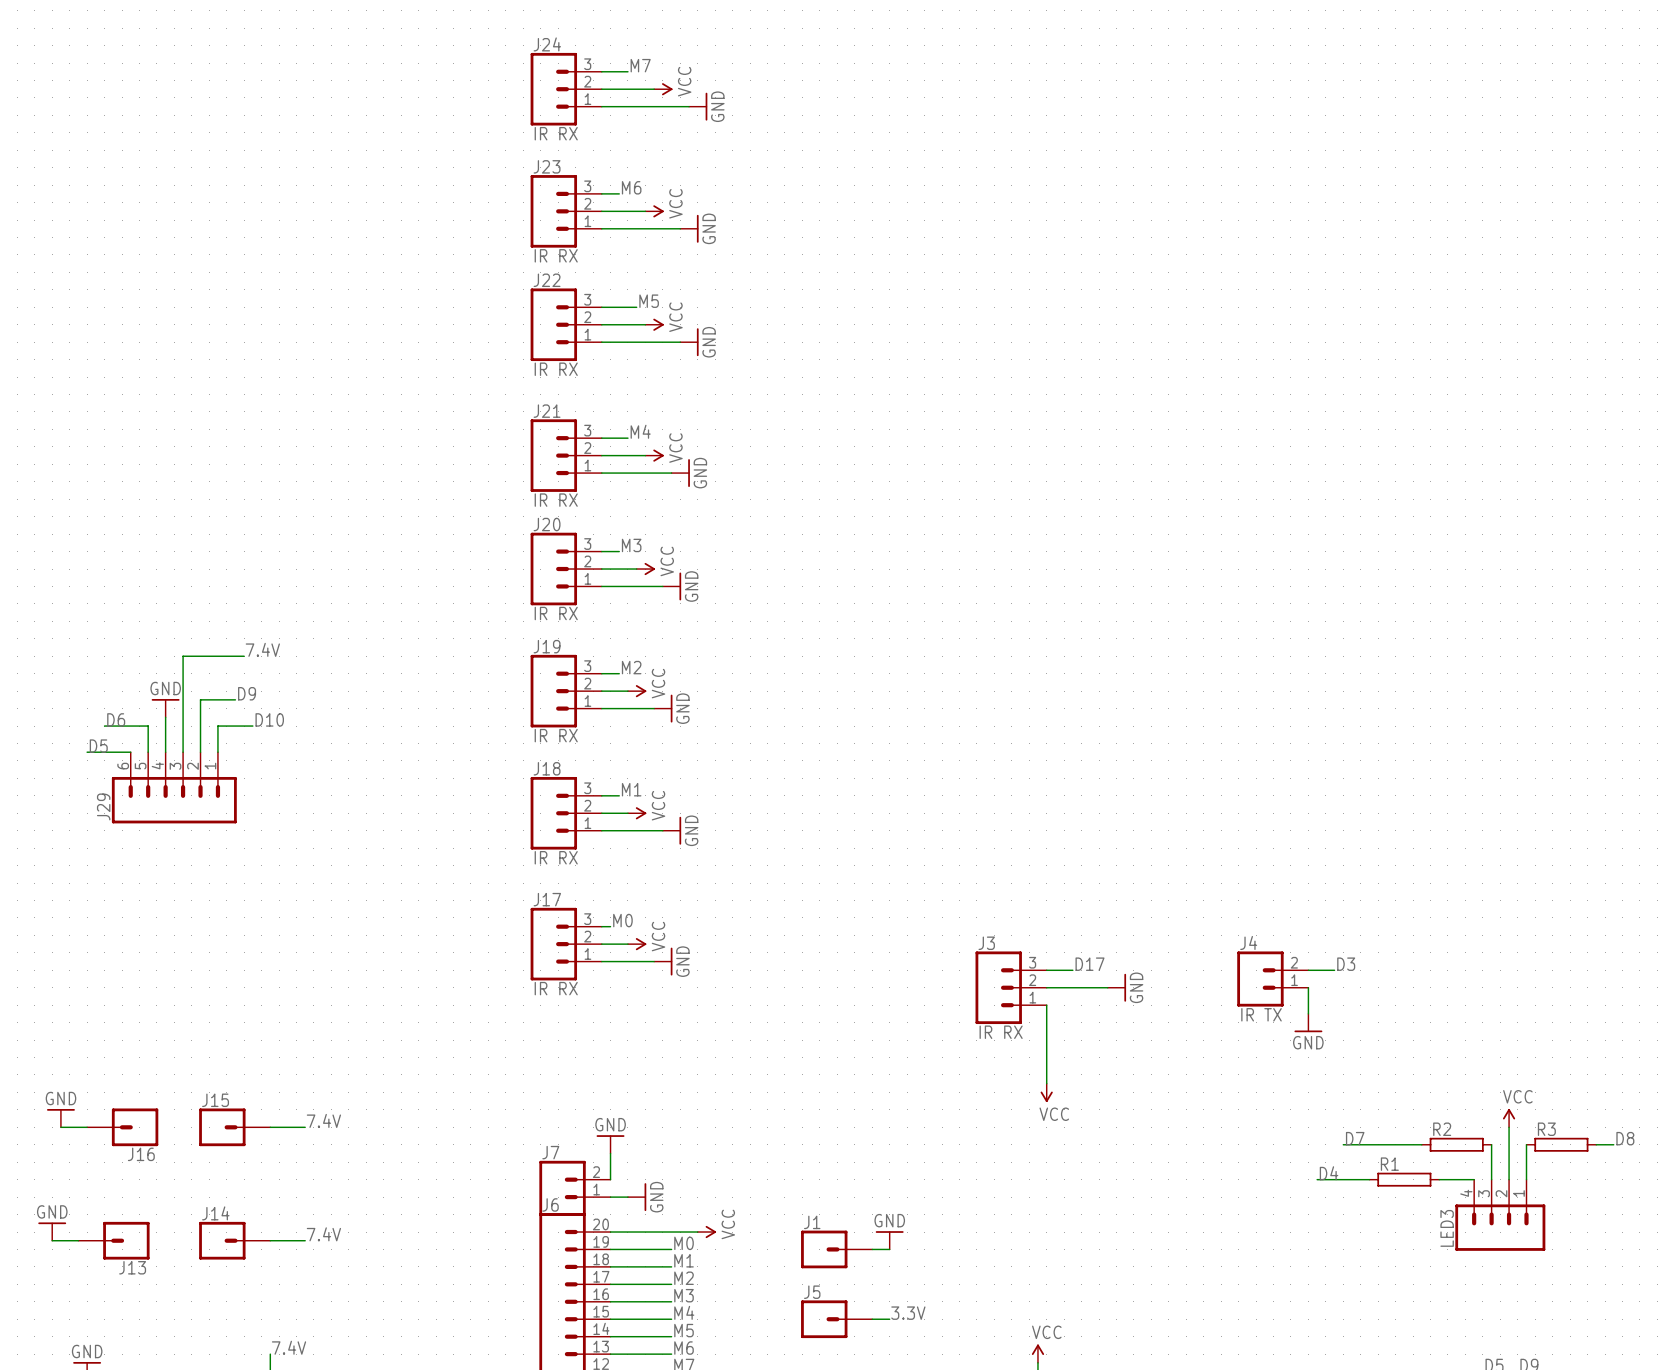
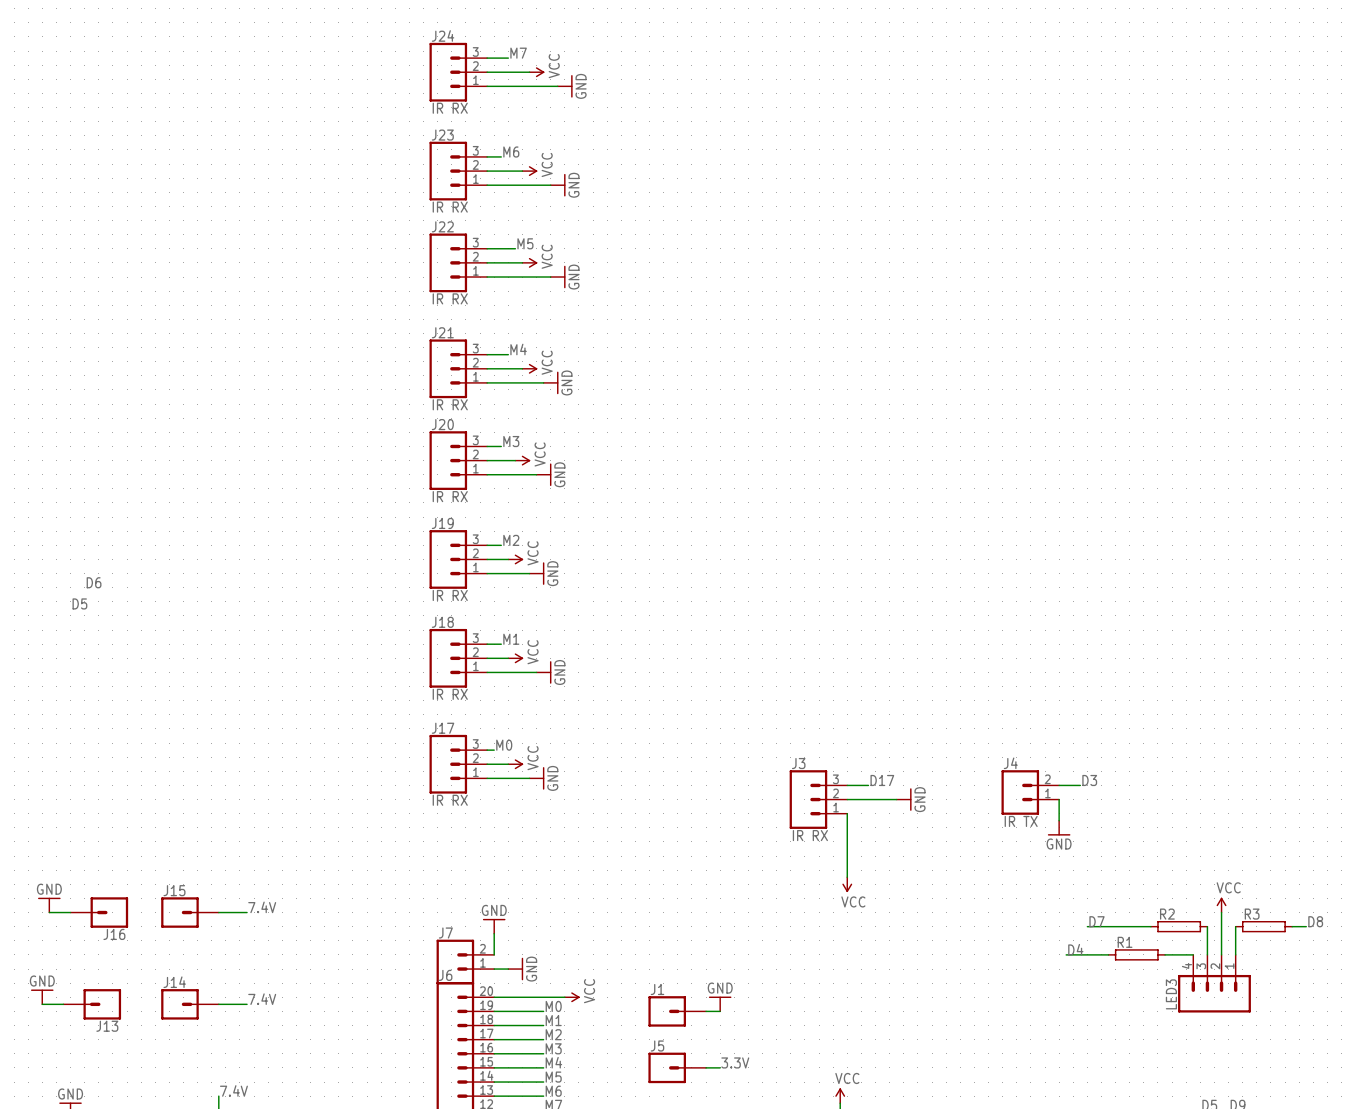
label: 7.4V (262, 649) -> none
wire: (244, 656) (183, 656) (183, 752) -> none
label: D9 (247, 693) -> none
wire: (235, 699) (200, 699) (200, 752) -> none
power symbol: GND (165, 708) -> none
wire: (165, 717) (165, 752) -> none
label: D10 (269, 719) -> none
wire: (104, 726) (148, 726) (148, 752) -> none
wire: (252, 726) (217, 726) (217, 752) -> none
wire: (87, 752) (130, 752) -> none
J29: (174, 787) -> none

